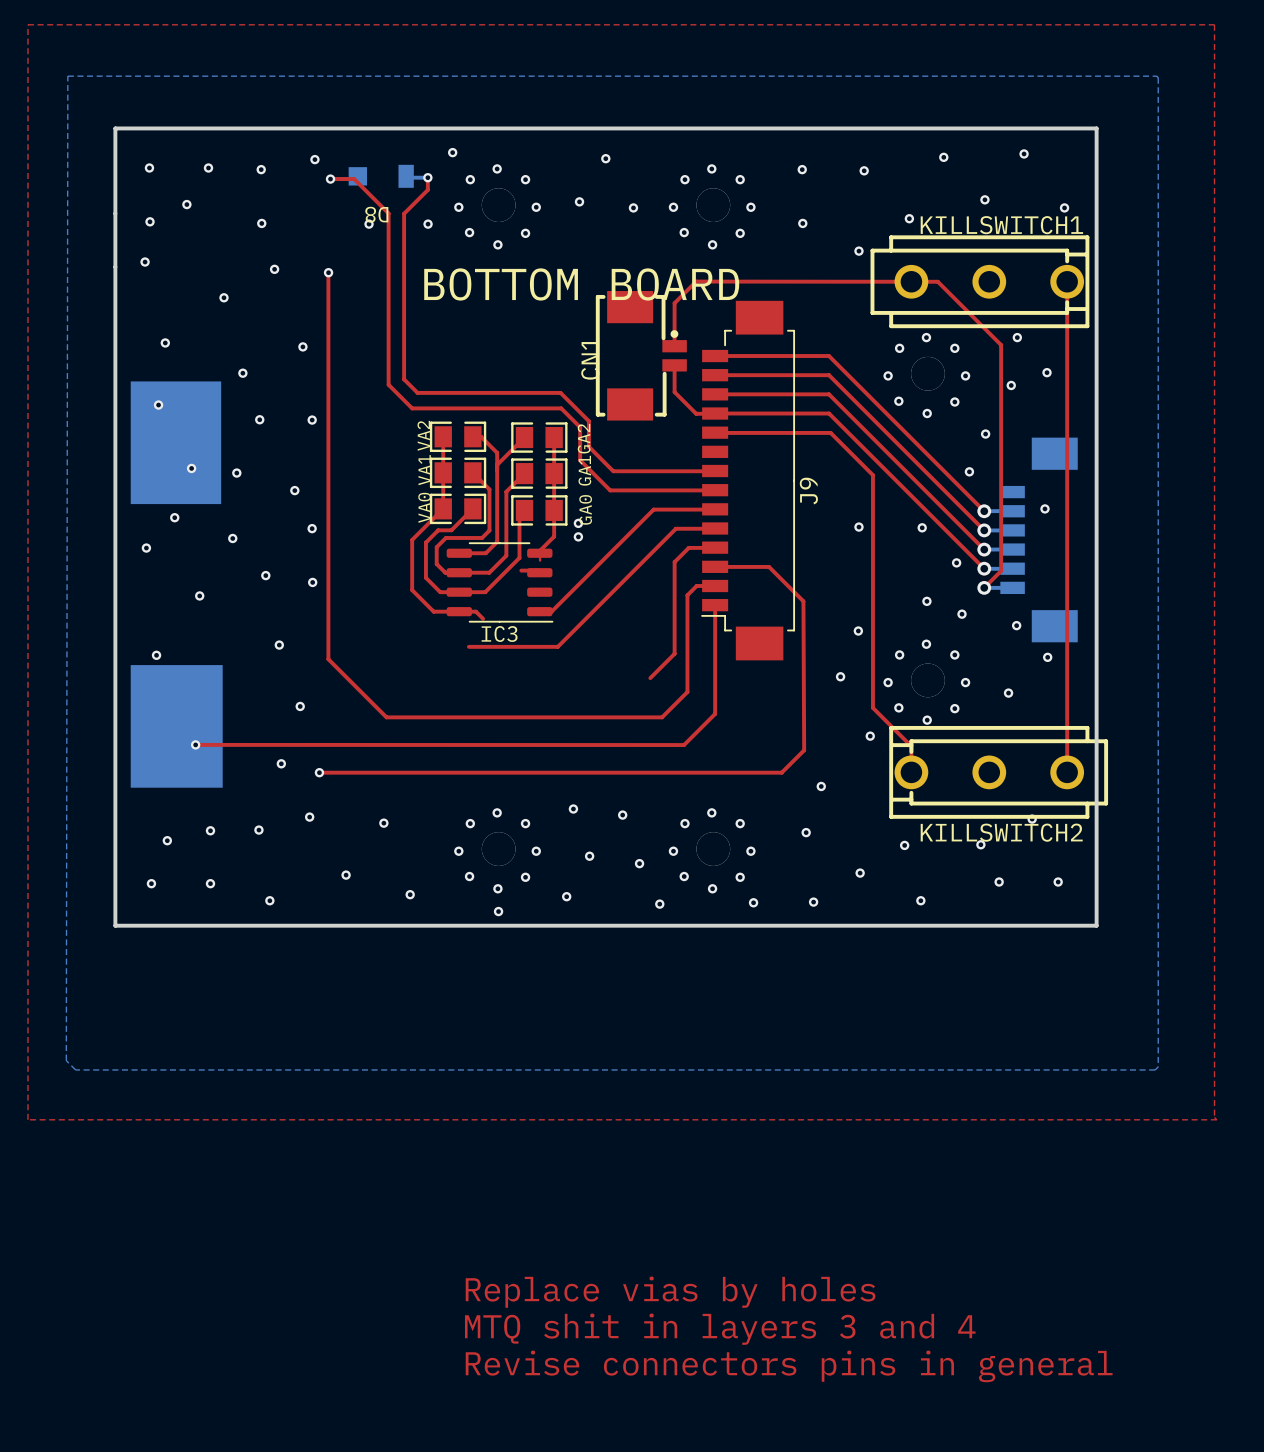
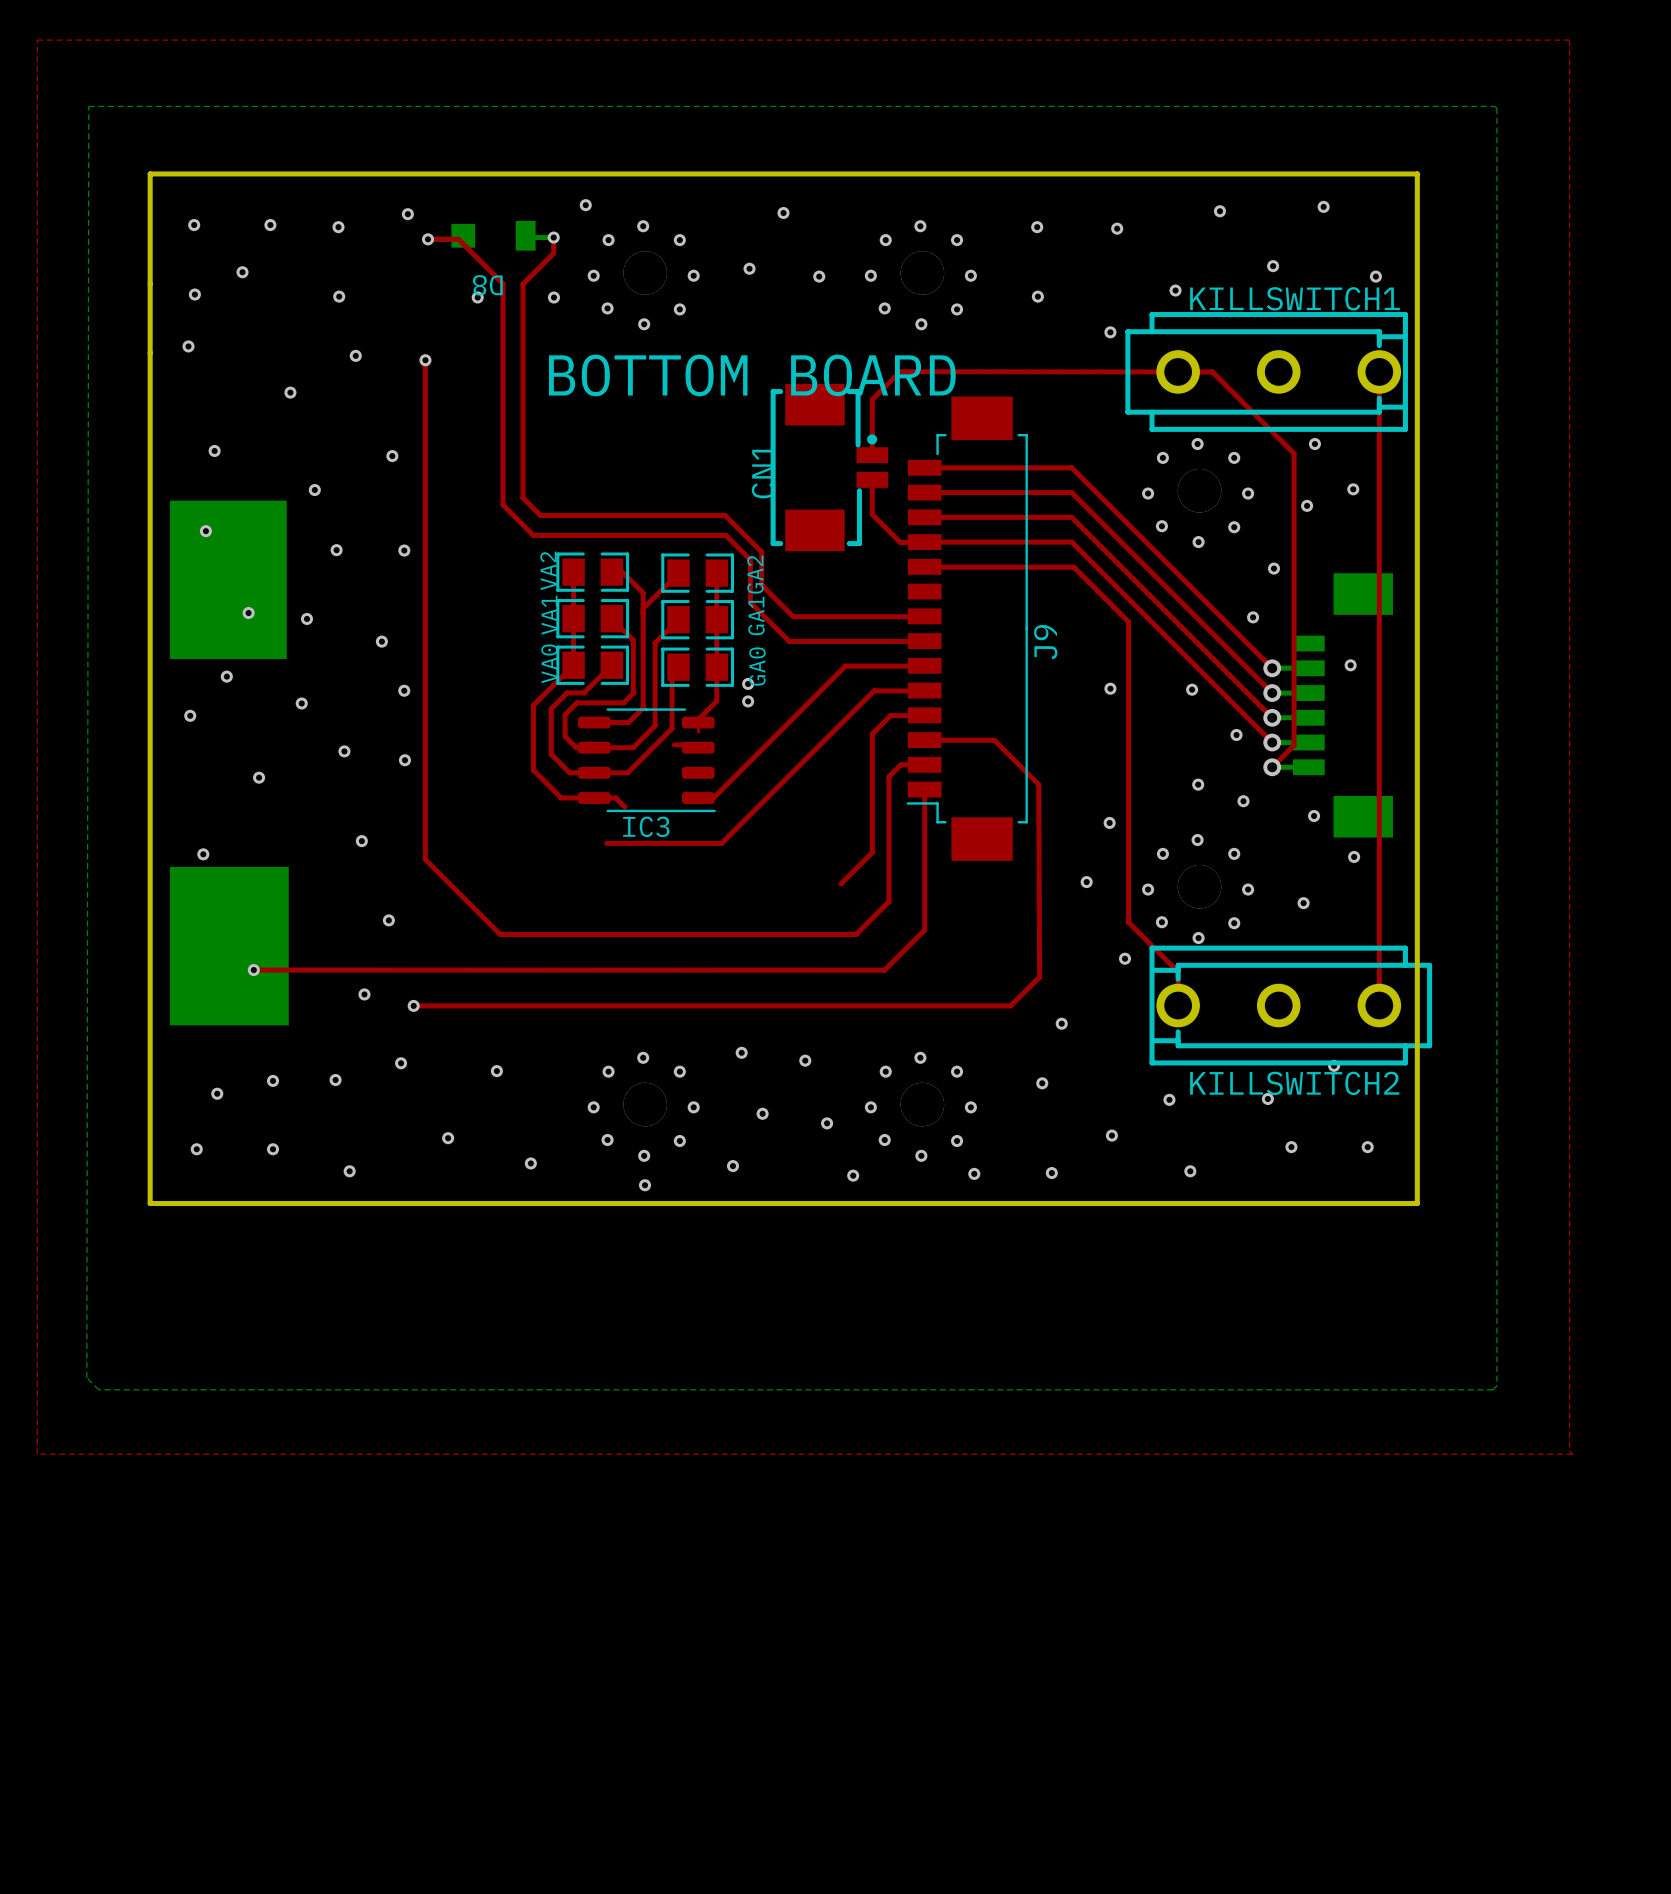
text: Replace vias by holes (670, 1292) -> none
text: MTQ shit in layers 3 and 4 (720, 1329) -> none
text: Revise connectors pins in general (789, 1366) -> none

